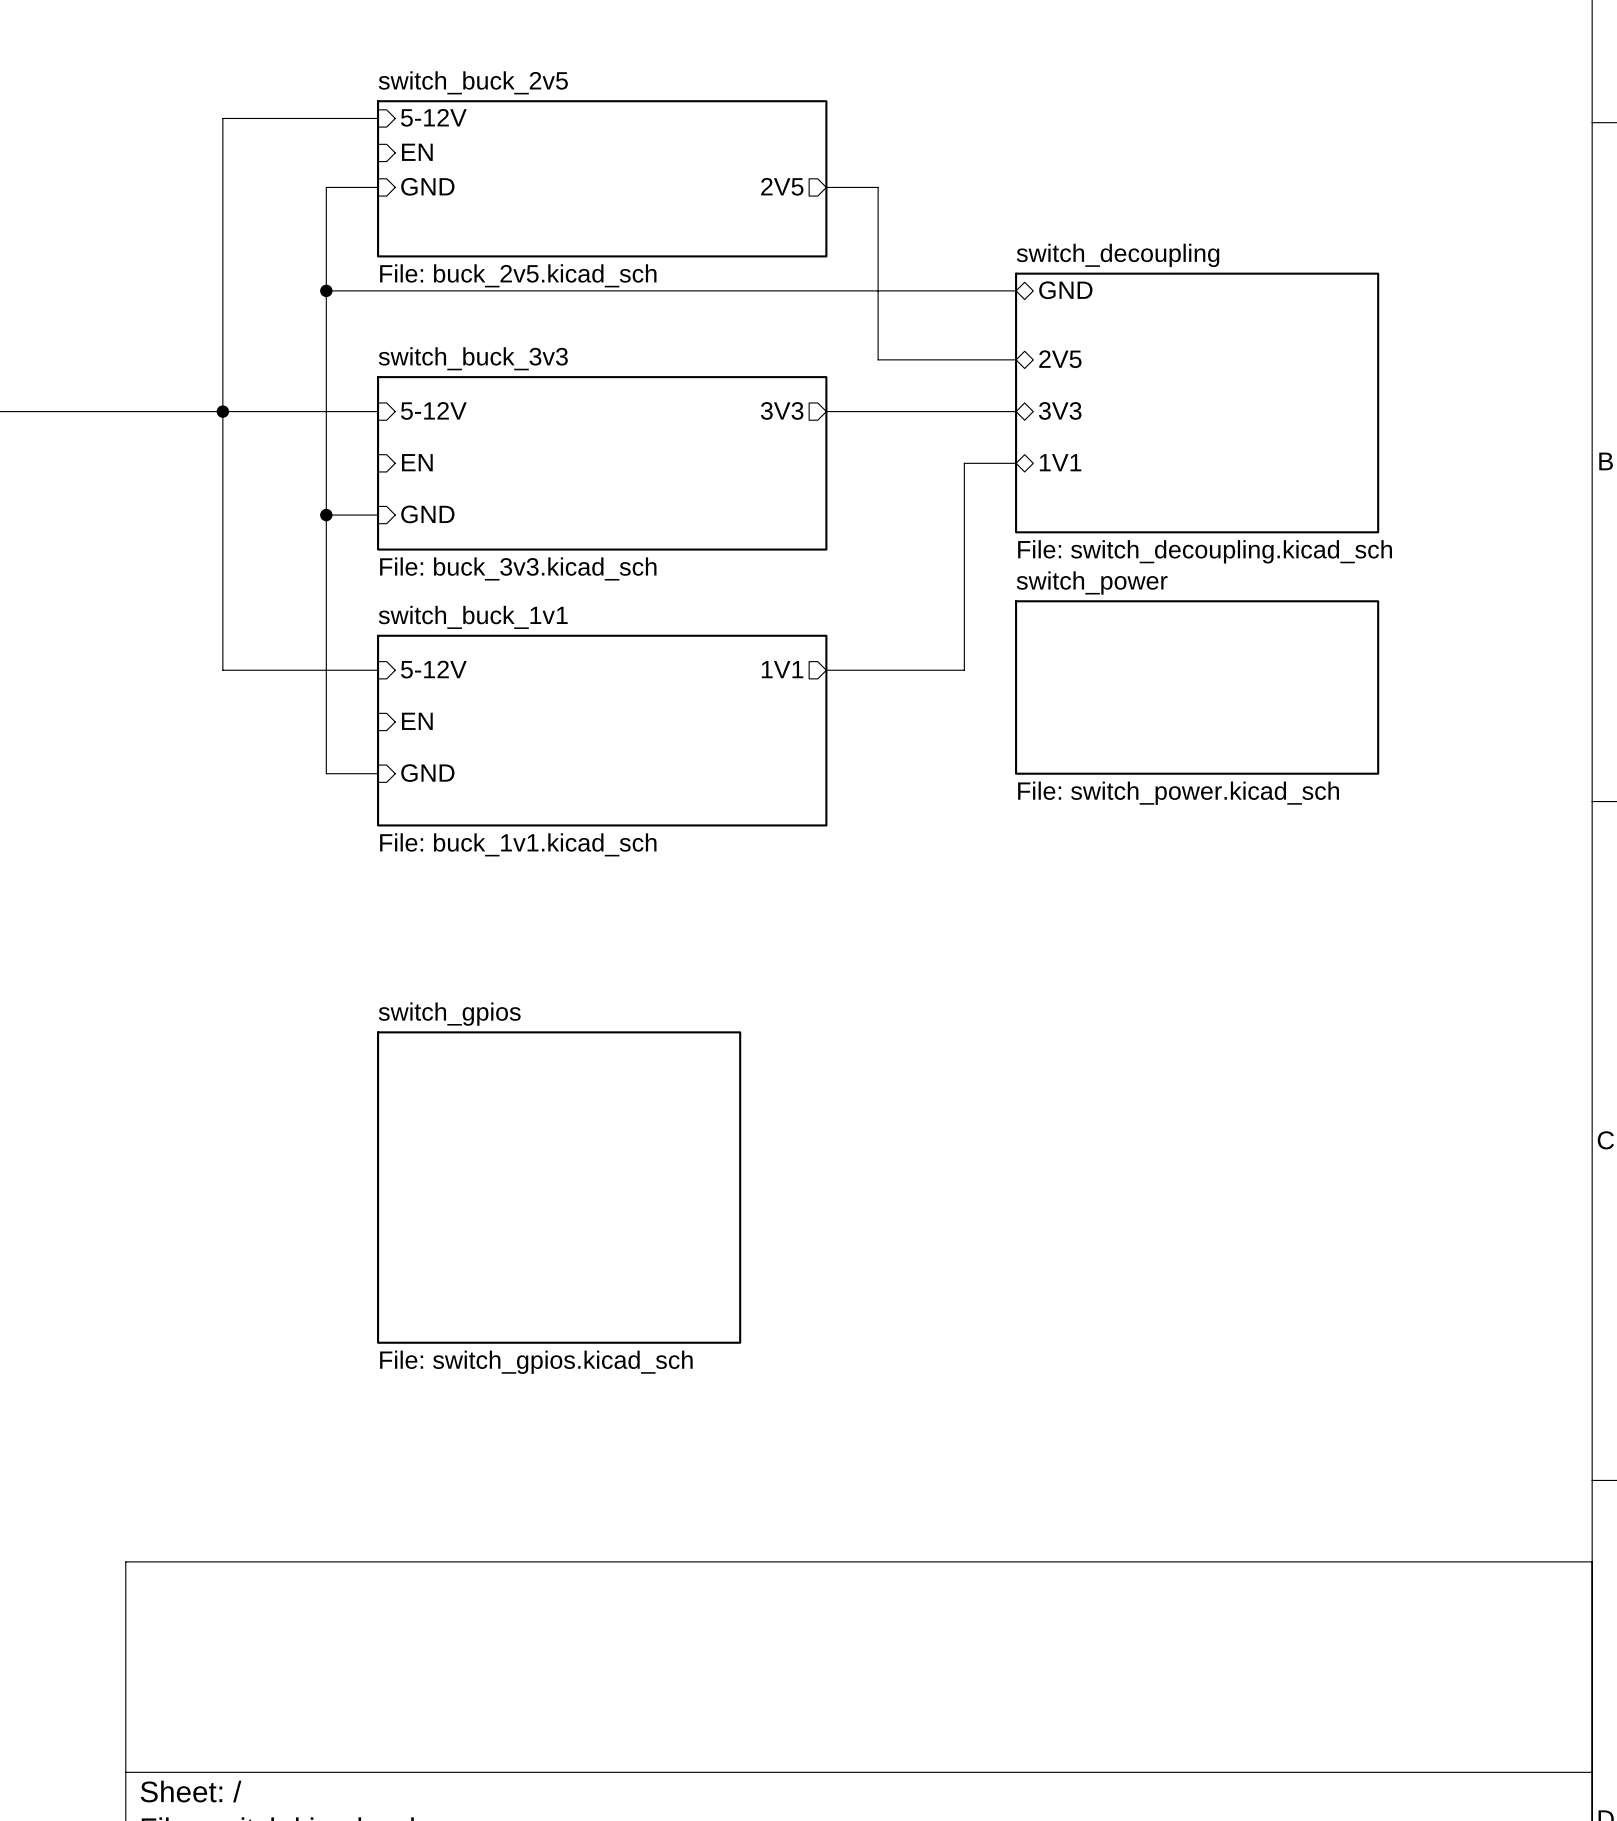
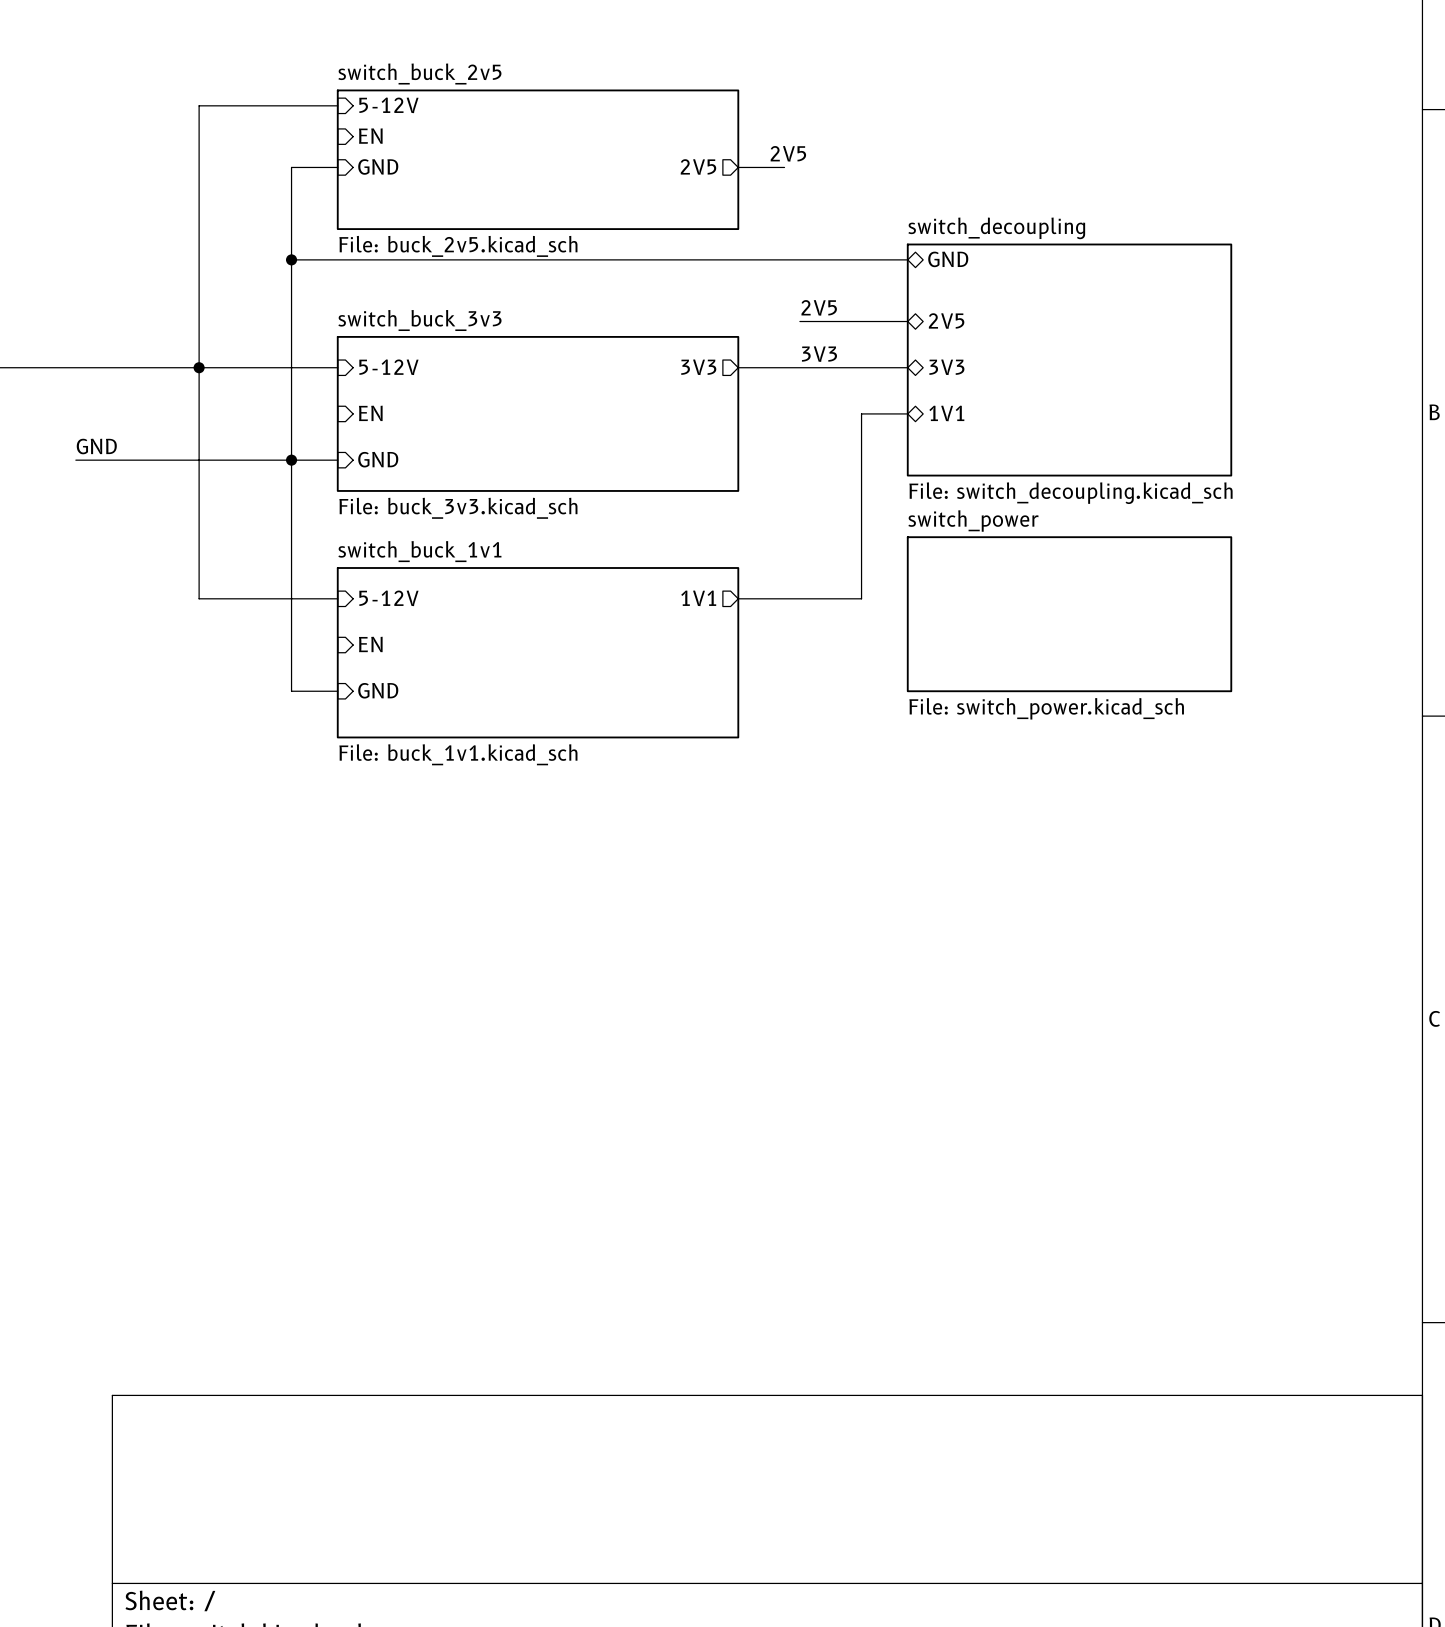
label: none -> 2V5 (788, 153)
wire: (878, 187) (878, 359) (895, 359) -> none
label: none -> 2V5 (819, 307)
label: none -> 3V3 (819, 354)
label: none -> GND (96, 446)
wire: none -> (75, 460) (291, 460)
sheet switch_gpios: File: switch_gpios.kicad_sch (559, 1187) -> none

